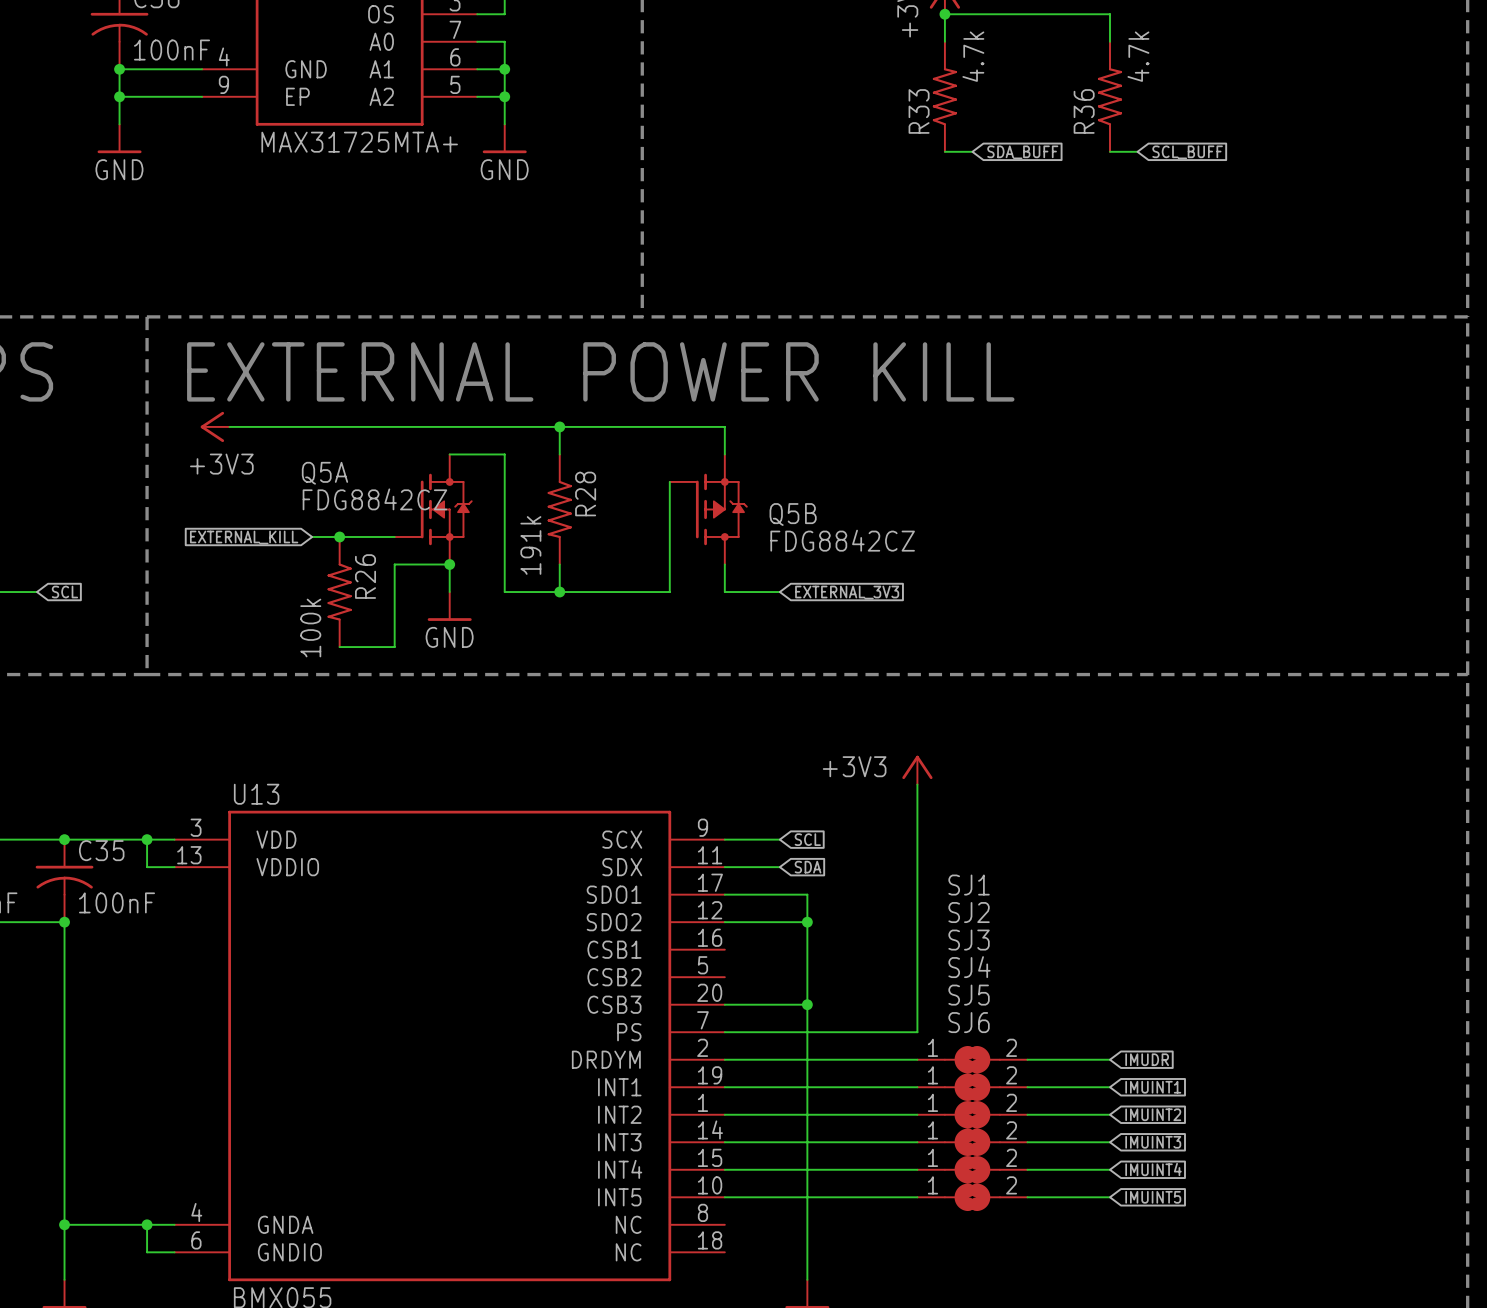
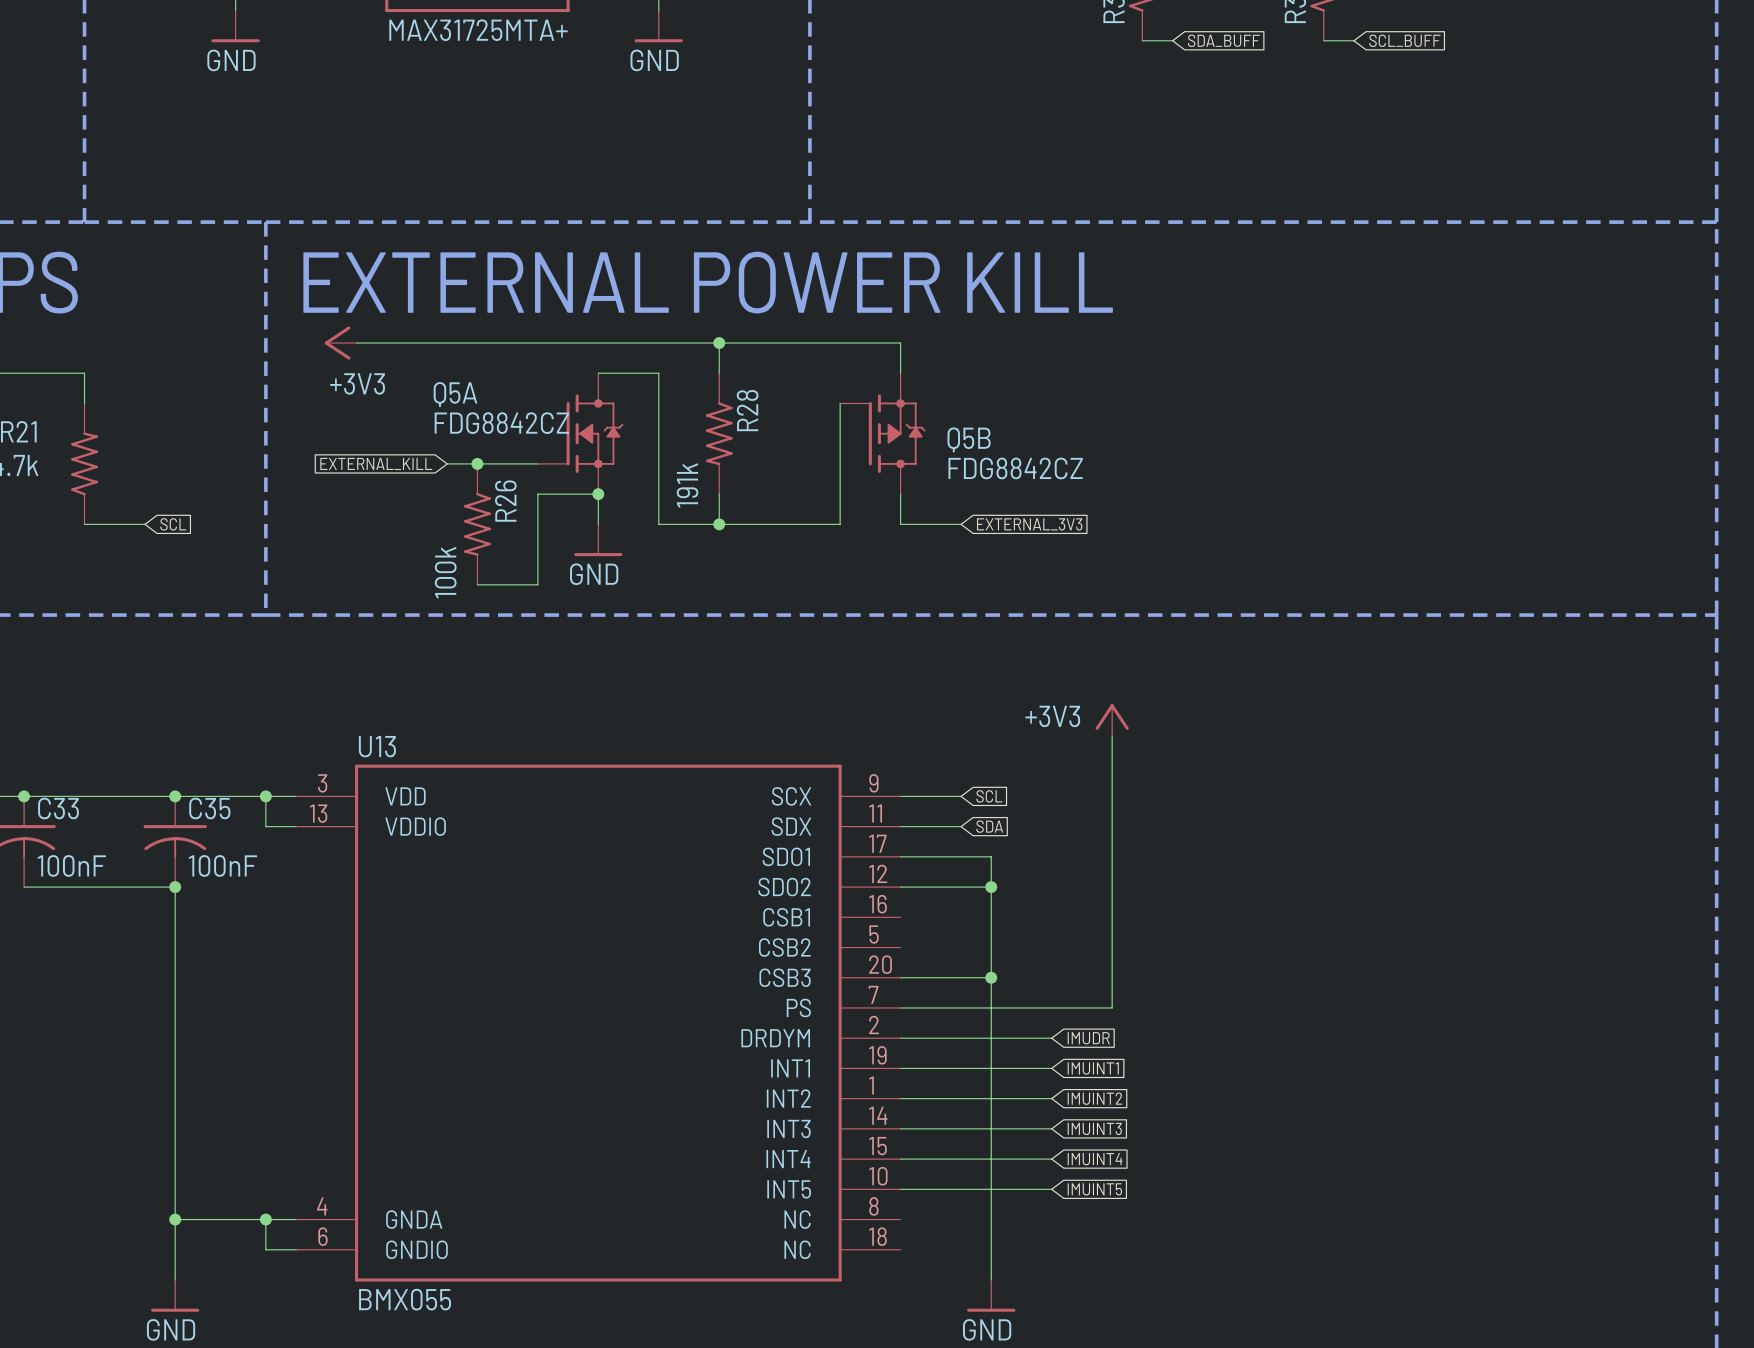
wire: (862, 1059) (917, 1059) -> none
SJ1: (972, 1059) -> none
wire: (1027, 1059) (1110, 1059) -> none
global label position: IMUDR (1147, 1059) -> IMUDR (1088, 1038)
wire: (862, 1087) (917, 1087) -> none
SJ2: (972, 1087) -> none
wire: (1027, 1087) (1110, 1087) -> none
global label position: IMUINT1 (1153, 1087) -> IMUINT1 (1093, 1068)
wire: (862, 1114) (917, 1114) -> none
SJ3: (972, 1114) -> none
wire: (1027, 1114) (1110, 1114) -> none
global label position: IMUINT2 (1153, 1114) -> IMUINT2 (1094, 1098)
wire: (862, 1142) (917, 1142) -> none
SJ4: (972, 1142) -> none
wire: (1027, 1142) (1110, 1142) -> none
global label position: IMUINT3 (1153, 1142) -> IMUINT3 (1094, 1128)
wire: (862, 1169) (917, 1169) -> none
SJ5: (972, 1169) -> none
wire: (1027, 1169) (1110, 1169) -> none
global label position: IMUINT4 (1153, 1169) -> IMUINT4 (1095, 1159)
wire: (862, 1197) (917, 1197) -> none
SJ6: (972, 1197) -> none
wire: (1027, 1197) (1110, 1197) -> none
global label position: IMUINT5 (1153, 1197) -> IMUINT5 (1094, 1189)

